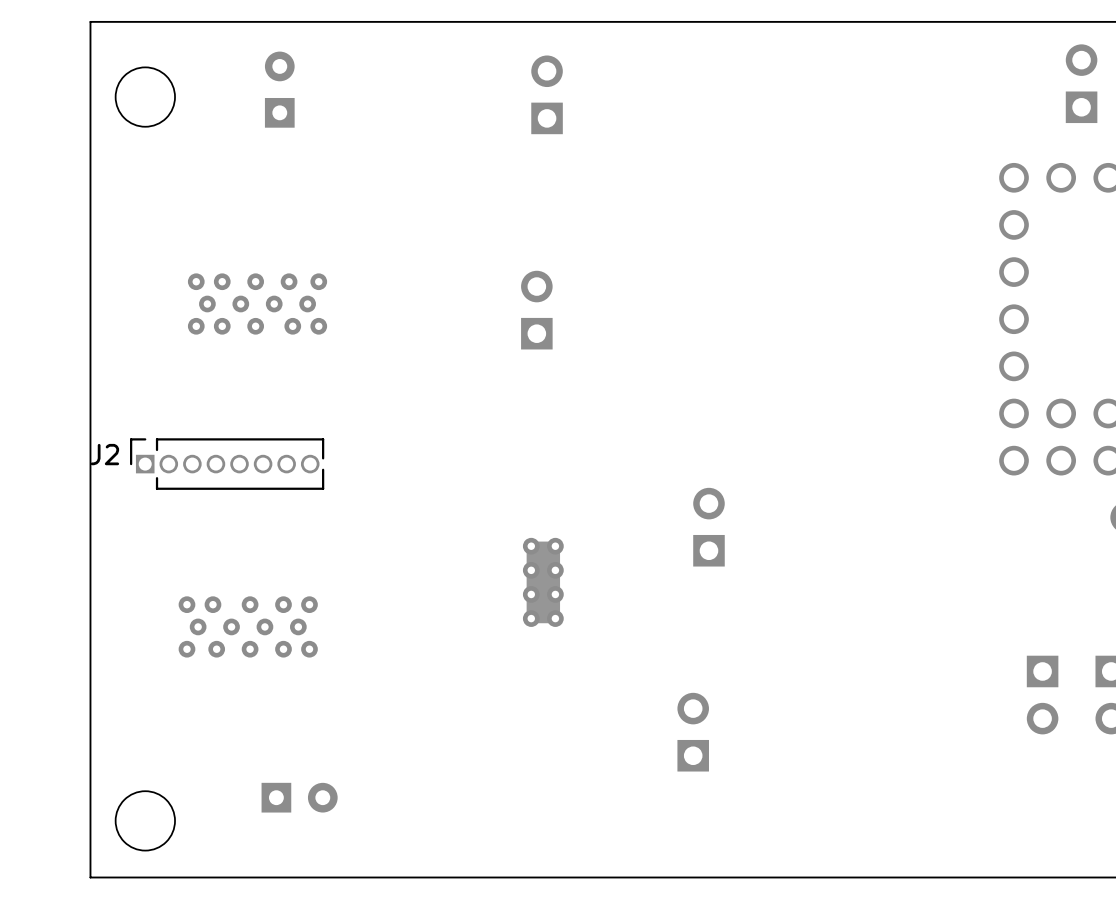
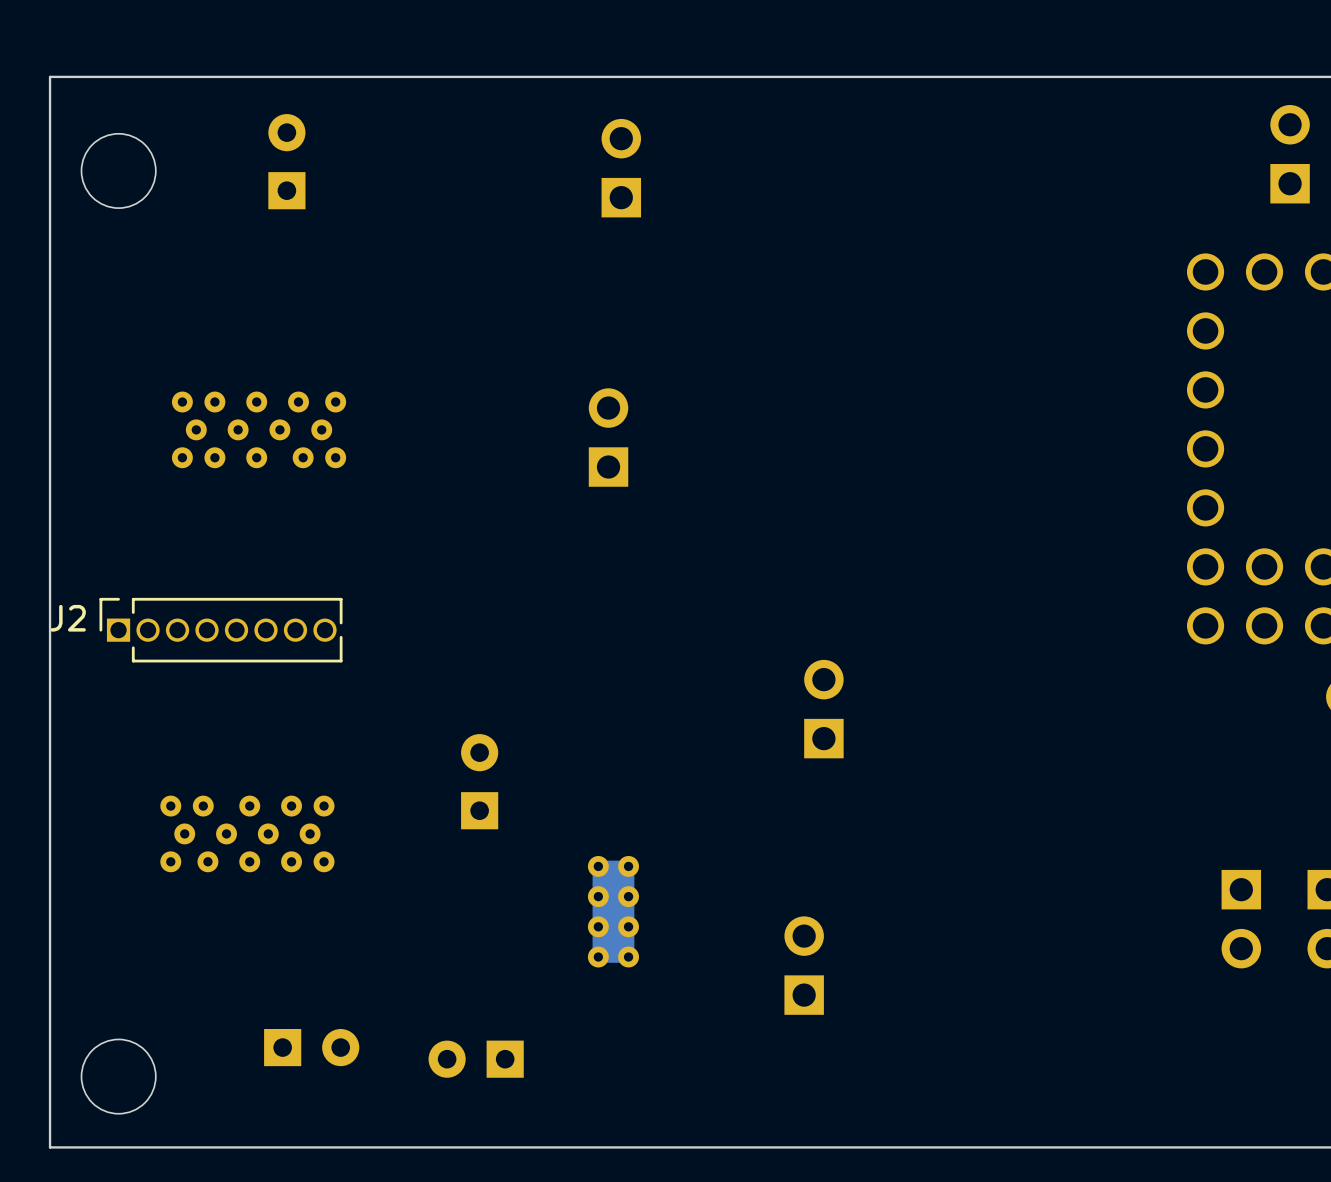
part position: (543, 582) -> (613, 911)
part: none -> (479, 781)
part: none -> (476, 1059)

